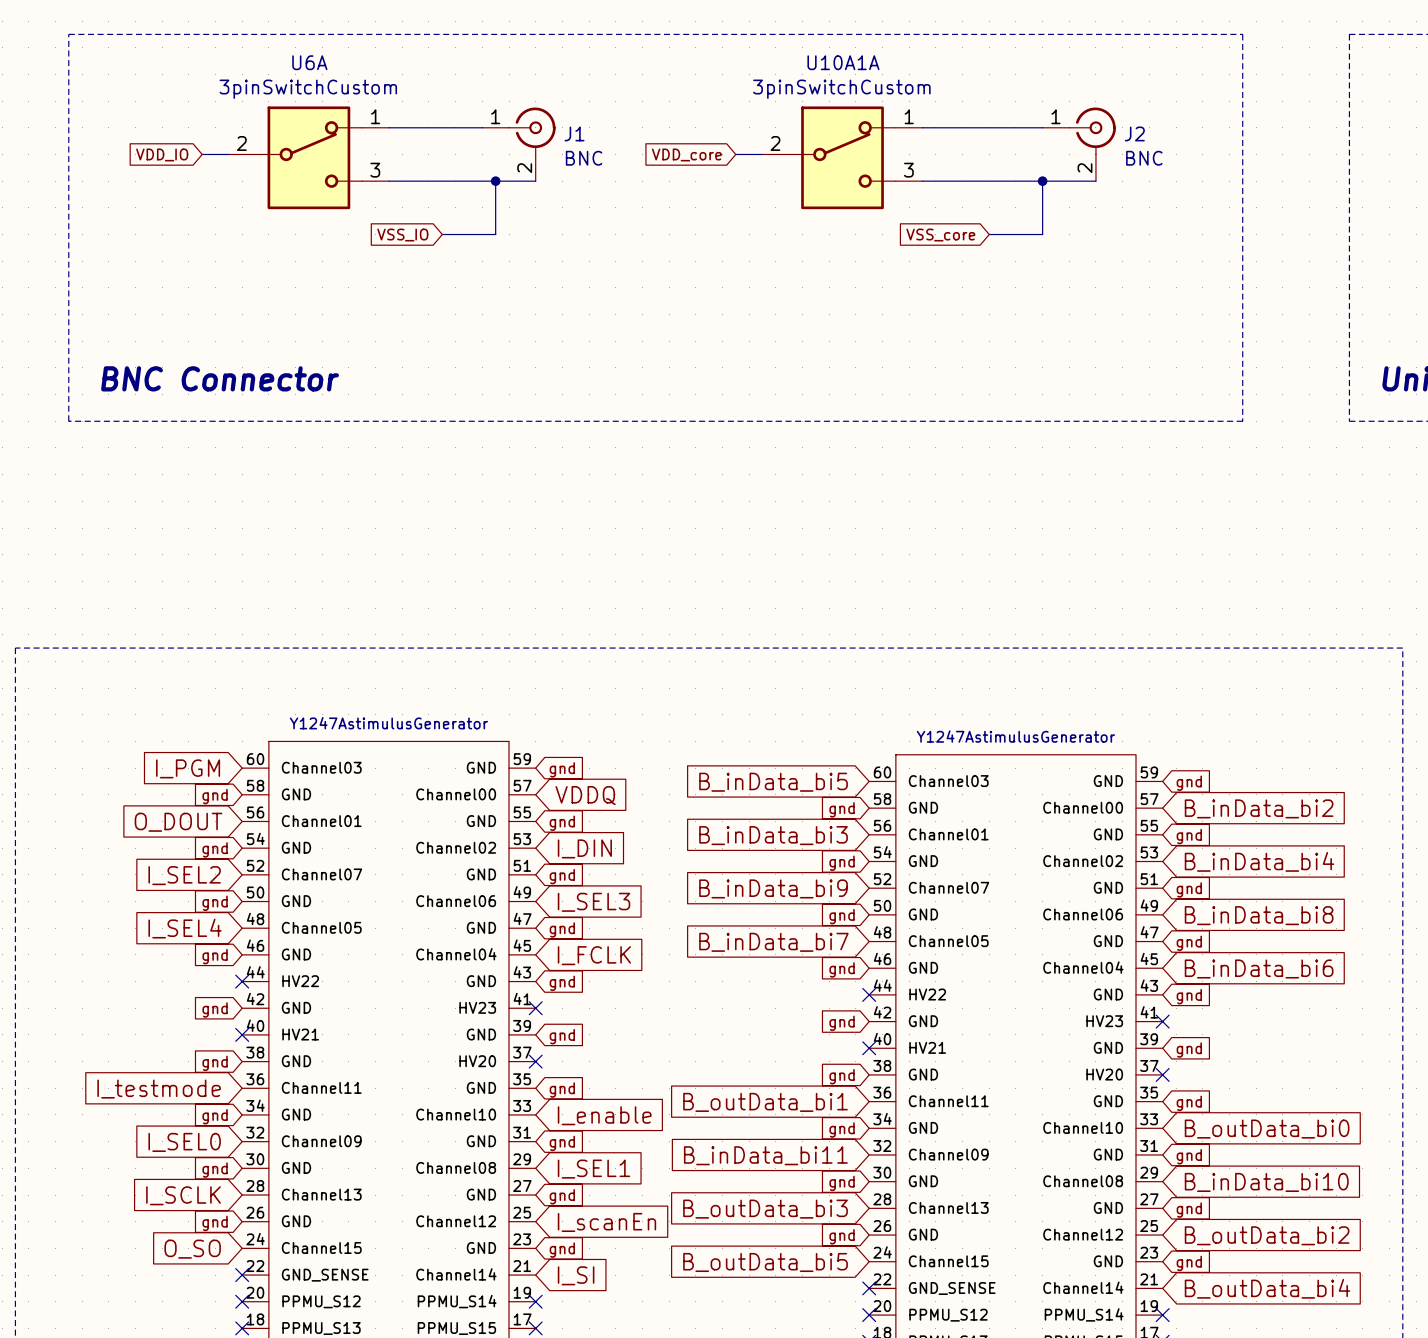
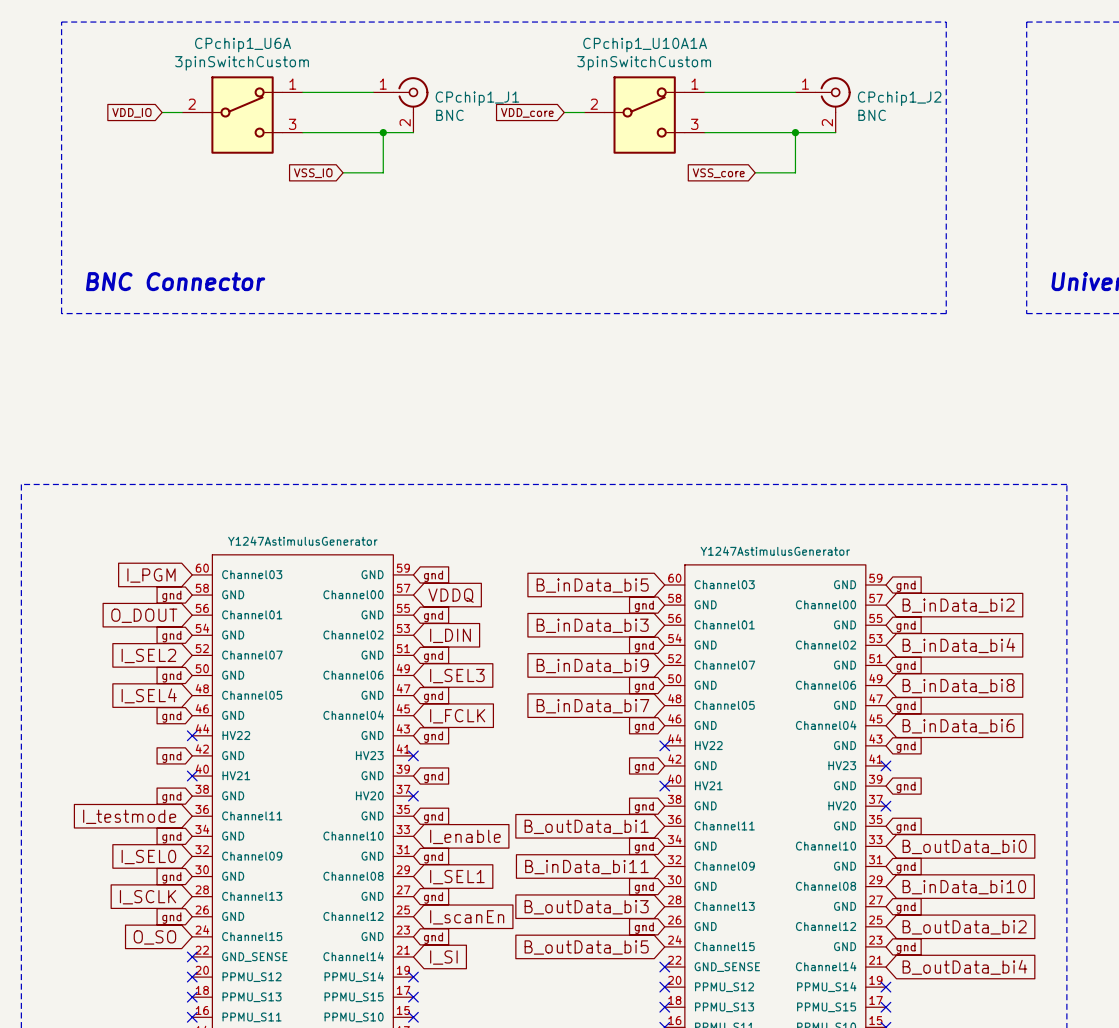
U6A name: U6A (309, 62) -> CPchip1_U6A (243, 45)
U10A1A name: U10A1A (843, 62) -> CPchip1_U10A1A (645, 45)
J1 name: J1 (574, 133) -> CPchip1_J1 (477, 98)
J2 name: J2 (1134, 133) -> CPchip1_J2 (899, 98)

